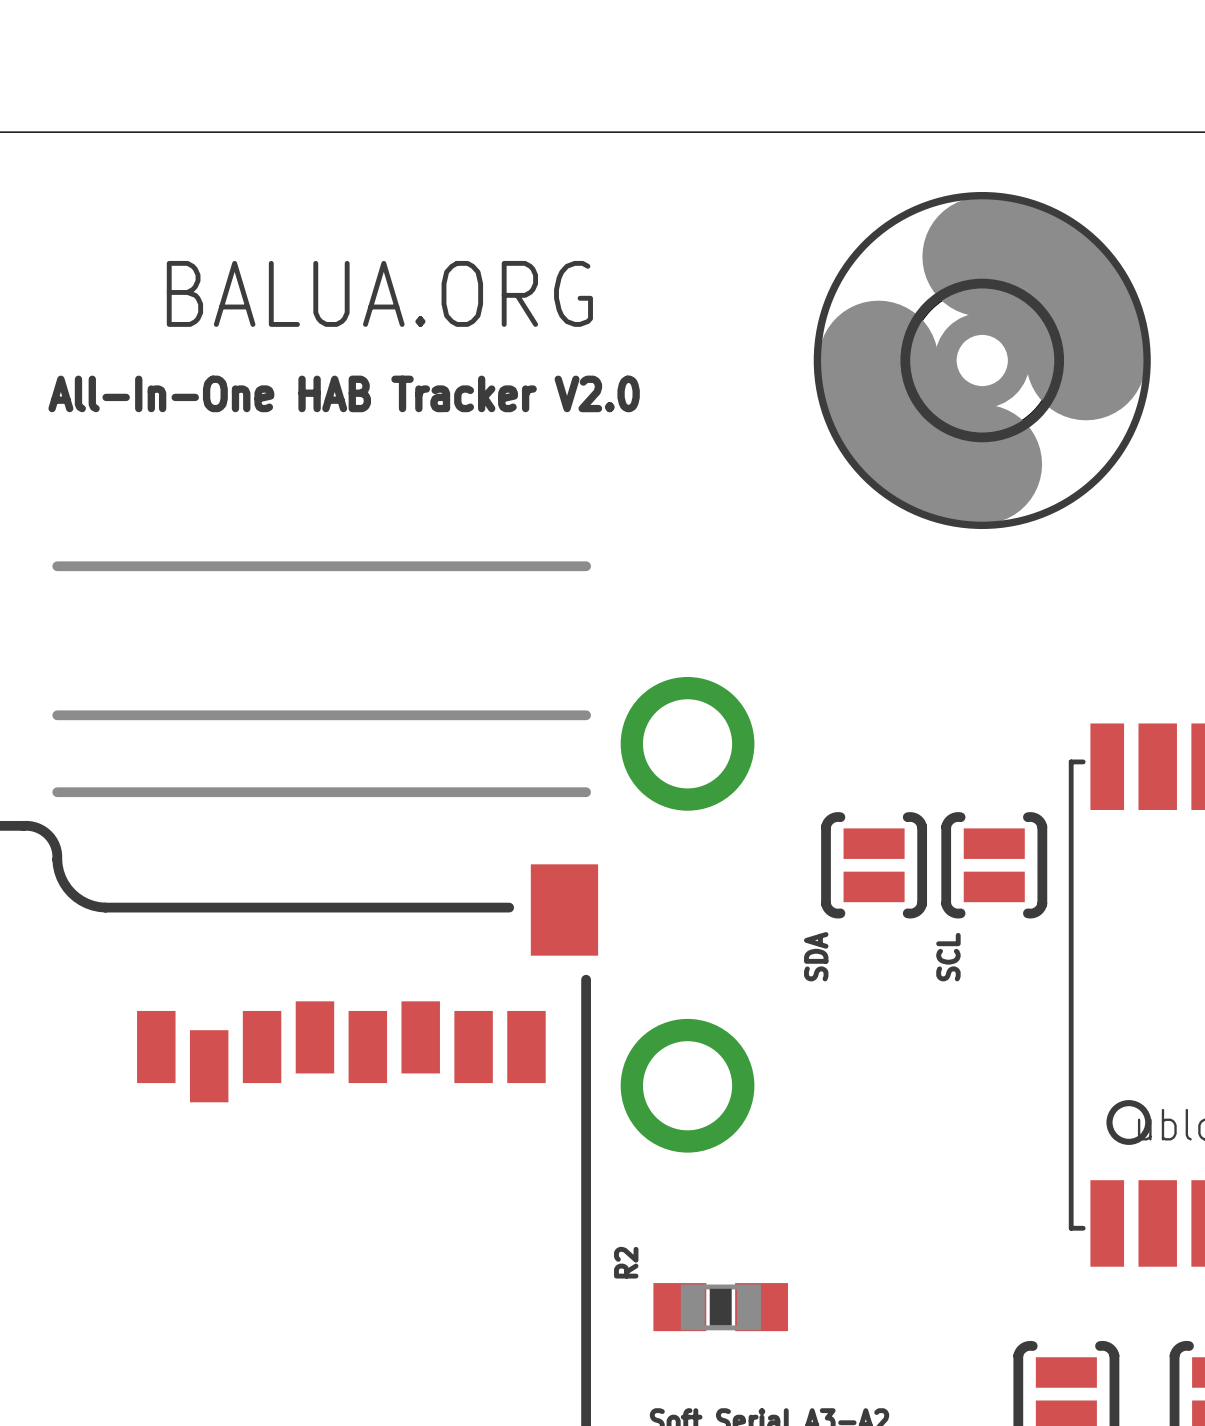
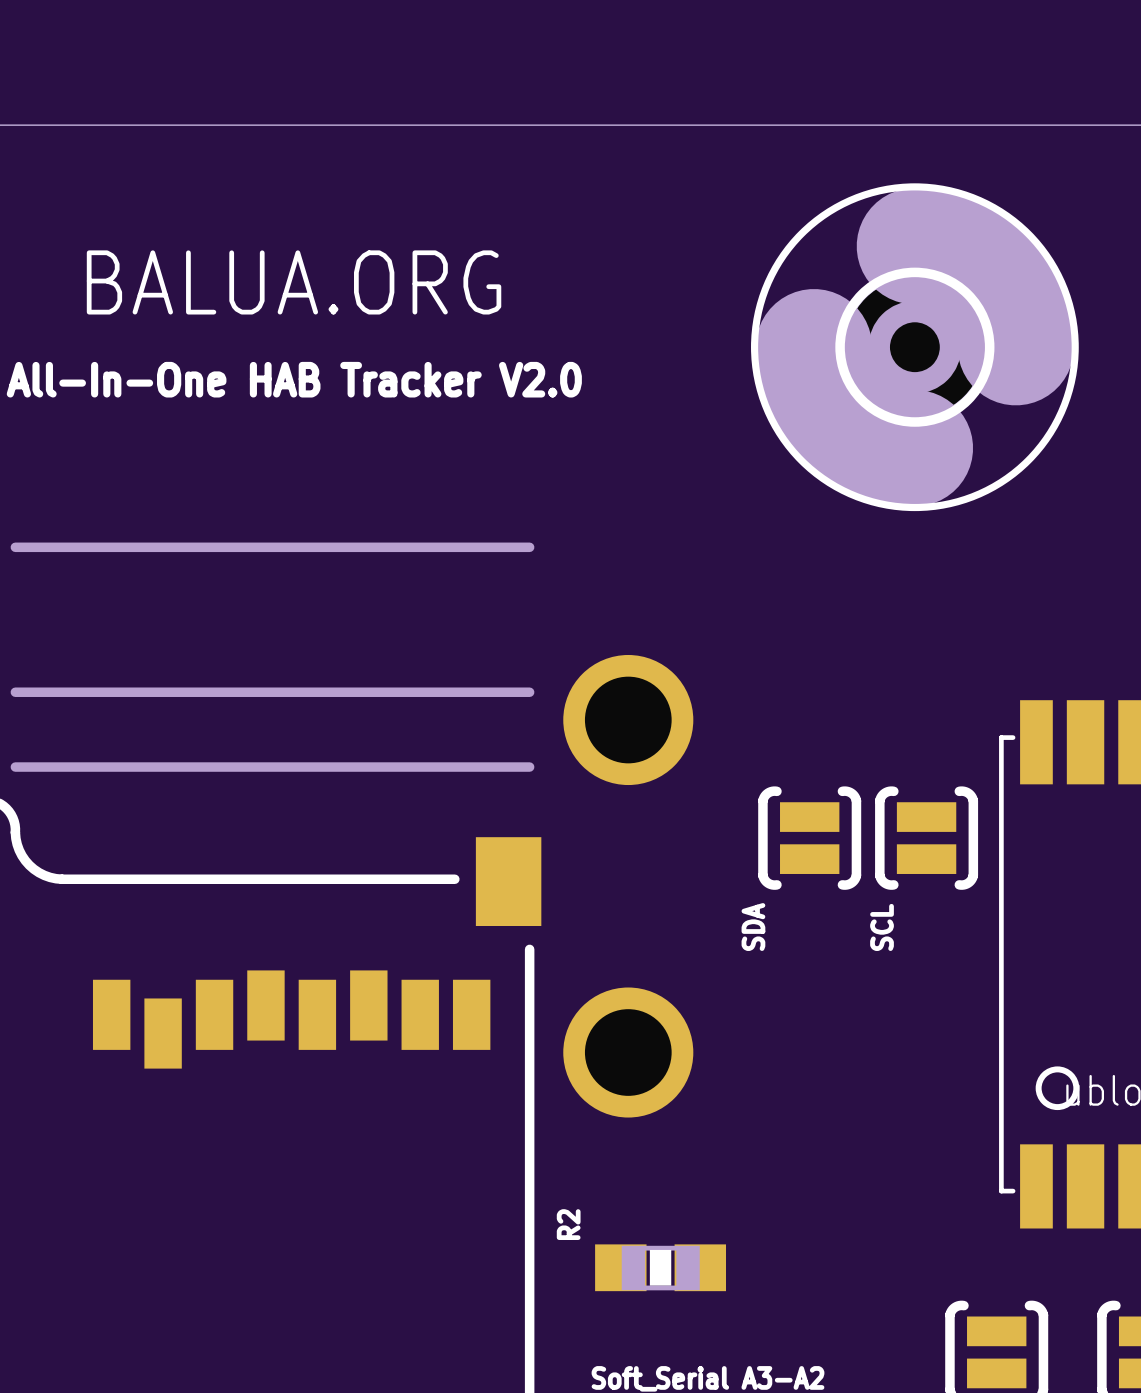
text position: BALUA.ORG (379, 293) -> BALUA.ORG (294, 282)

